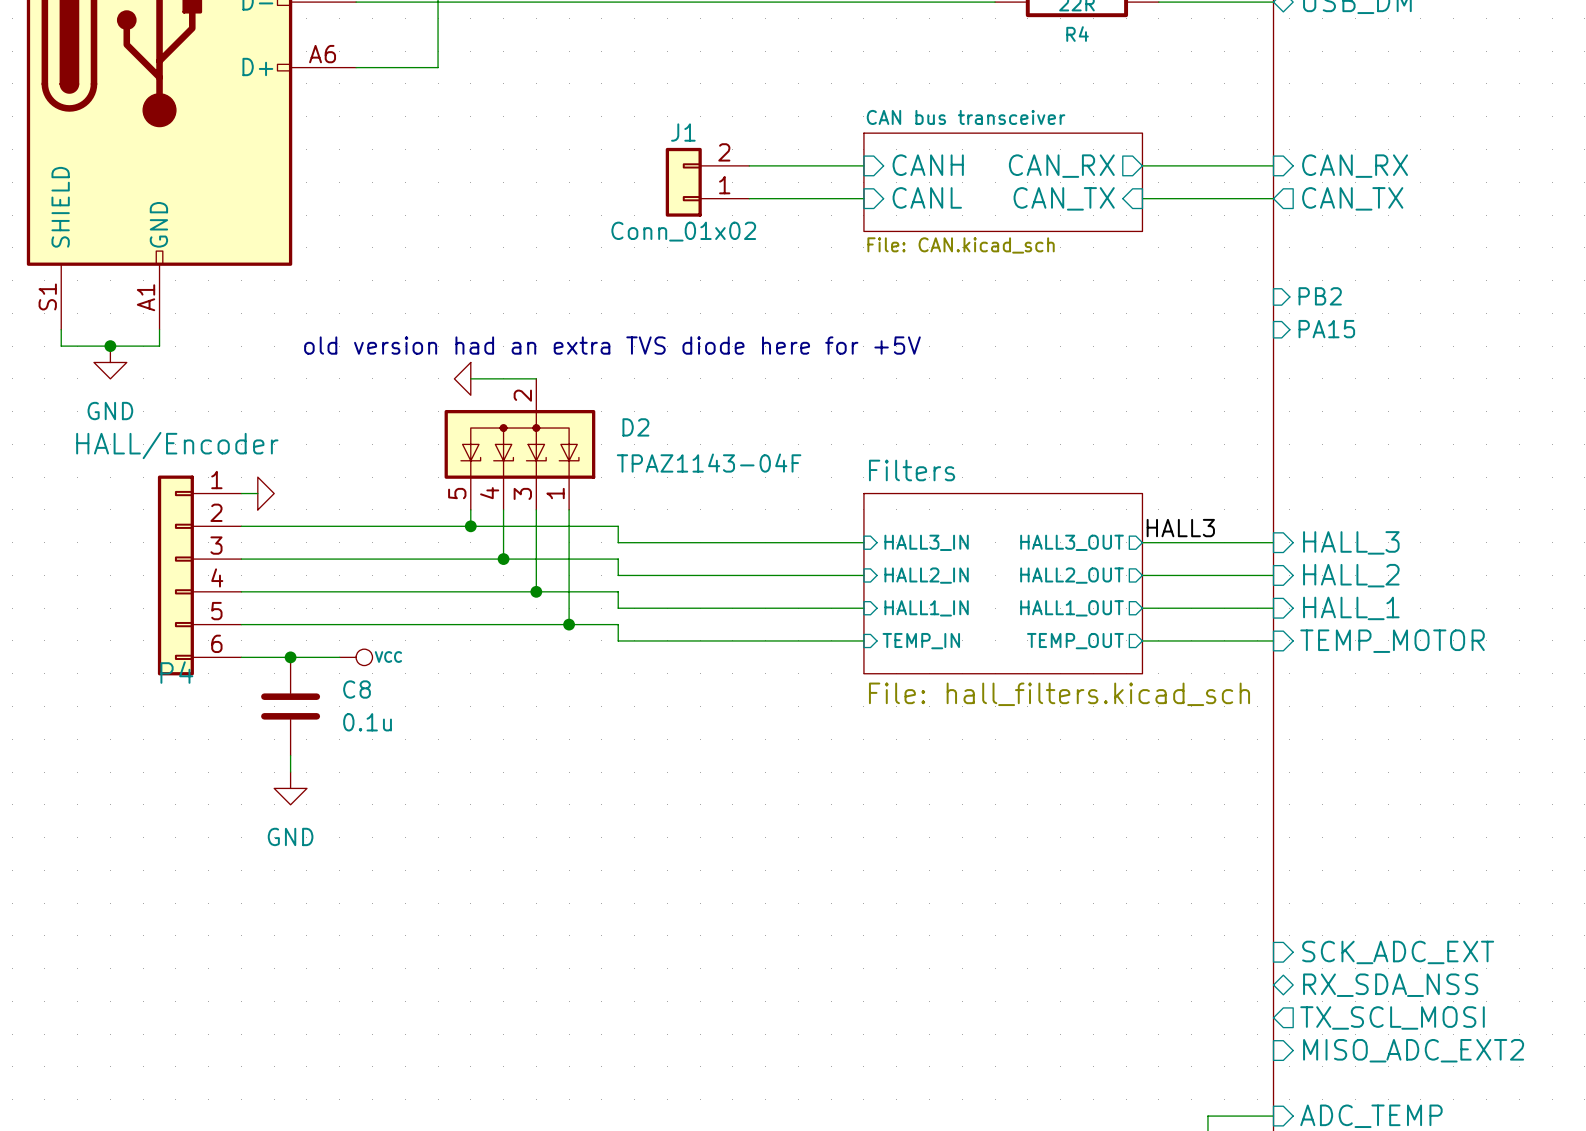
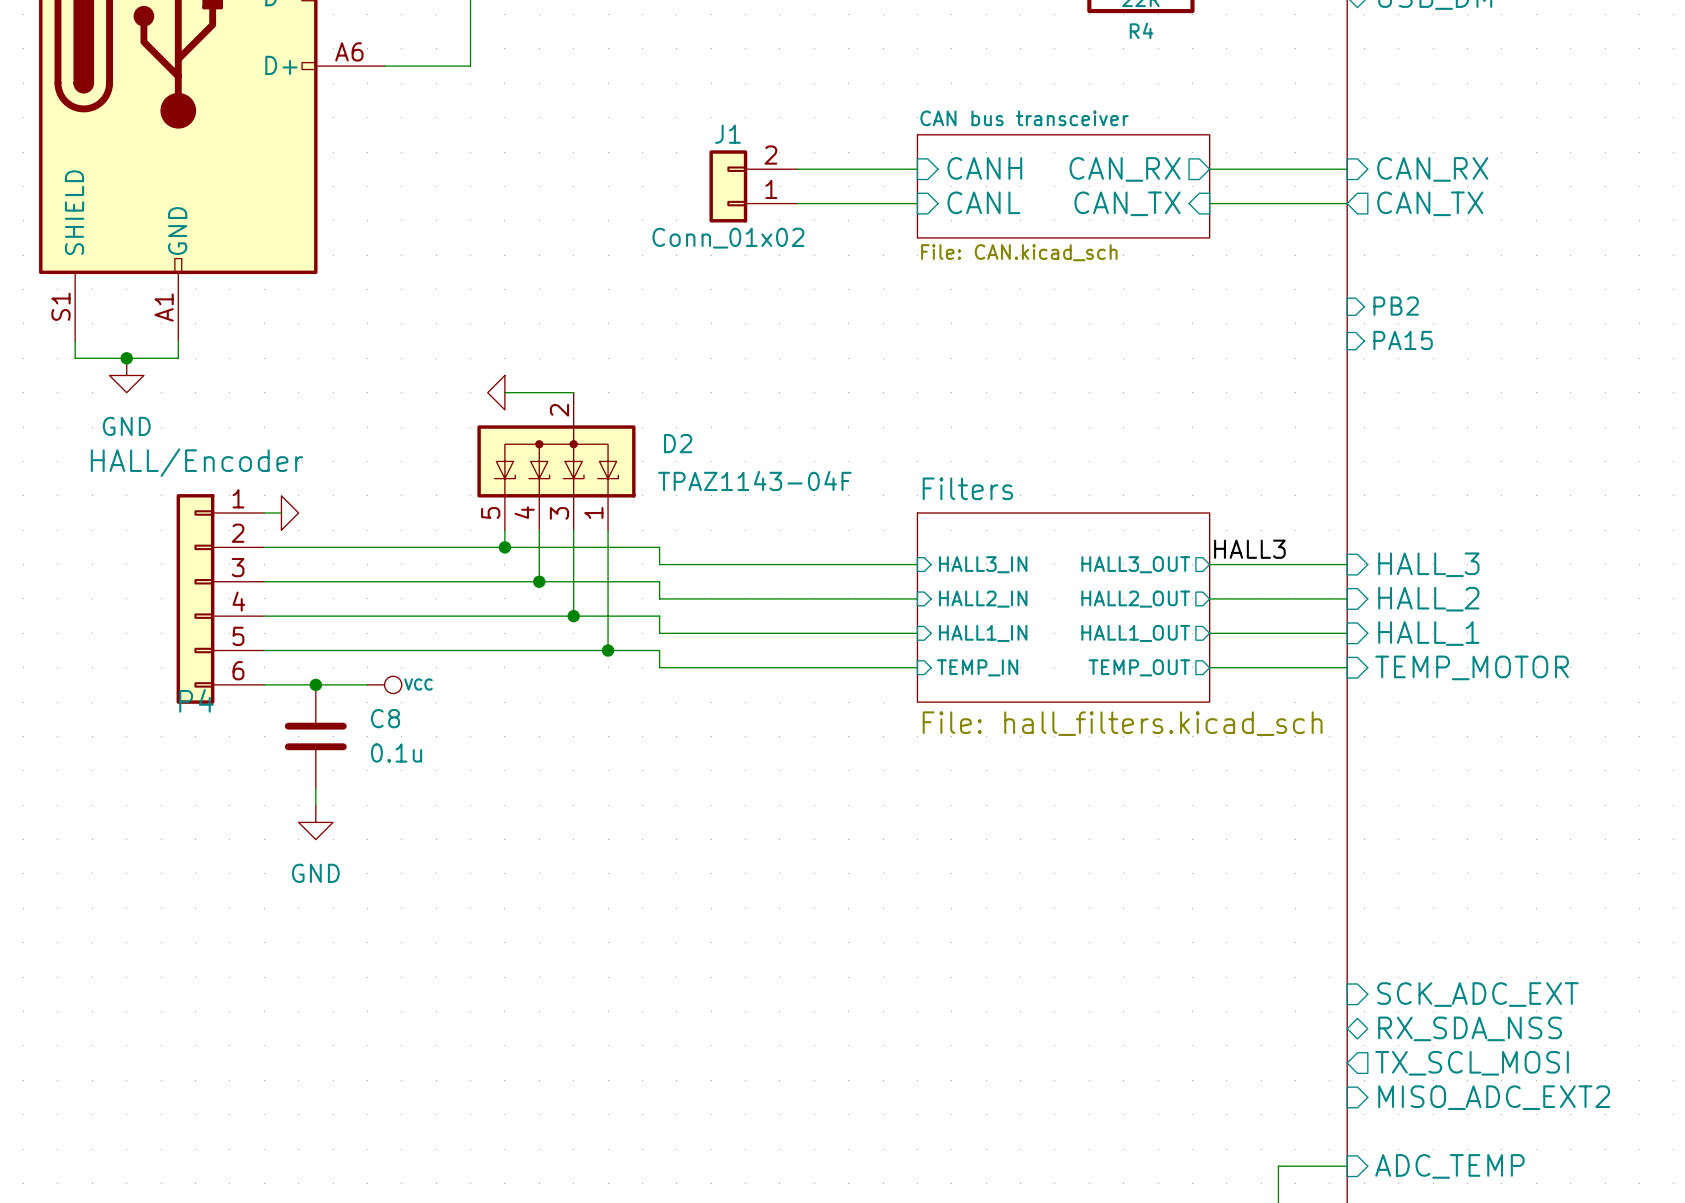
text: old version had an extra TVS diode here for +5V (612, 345) -> none

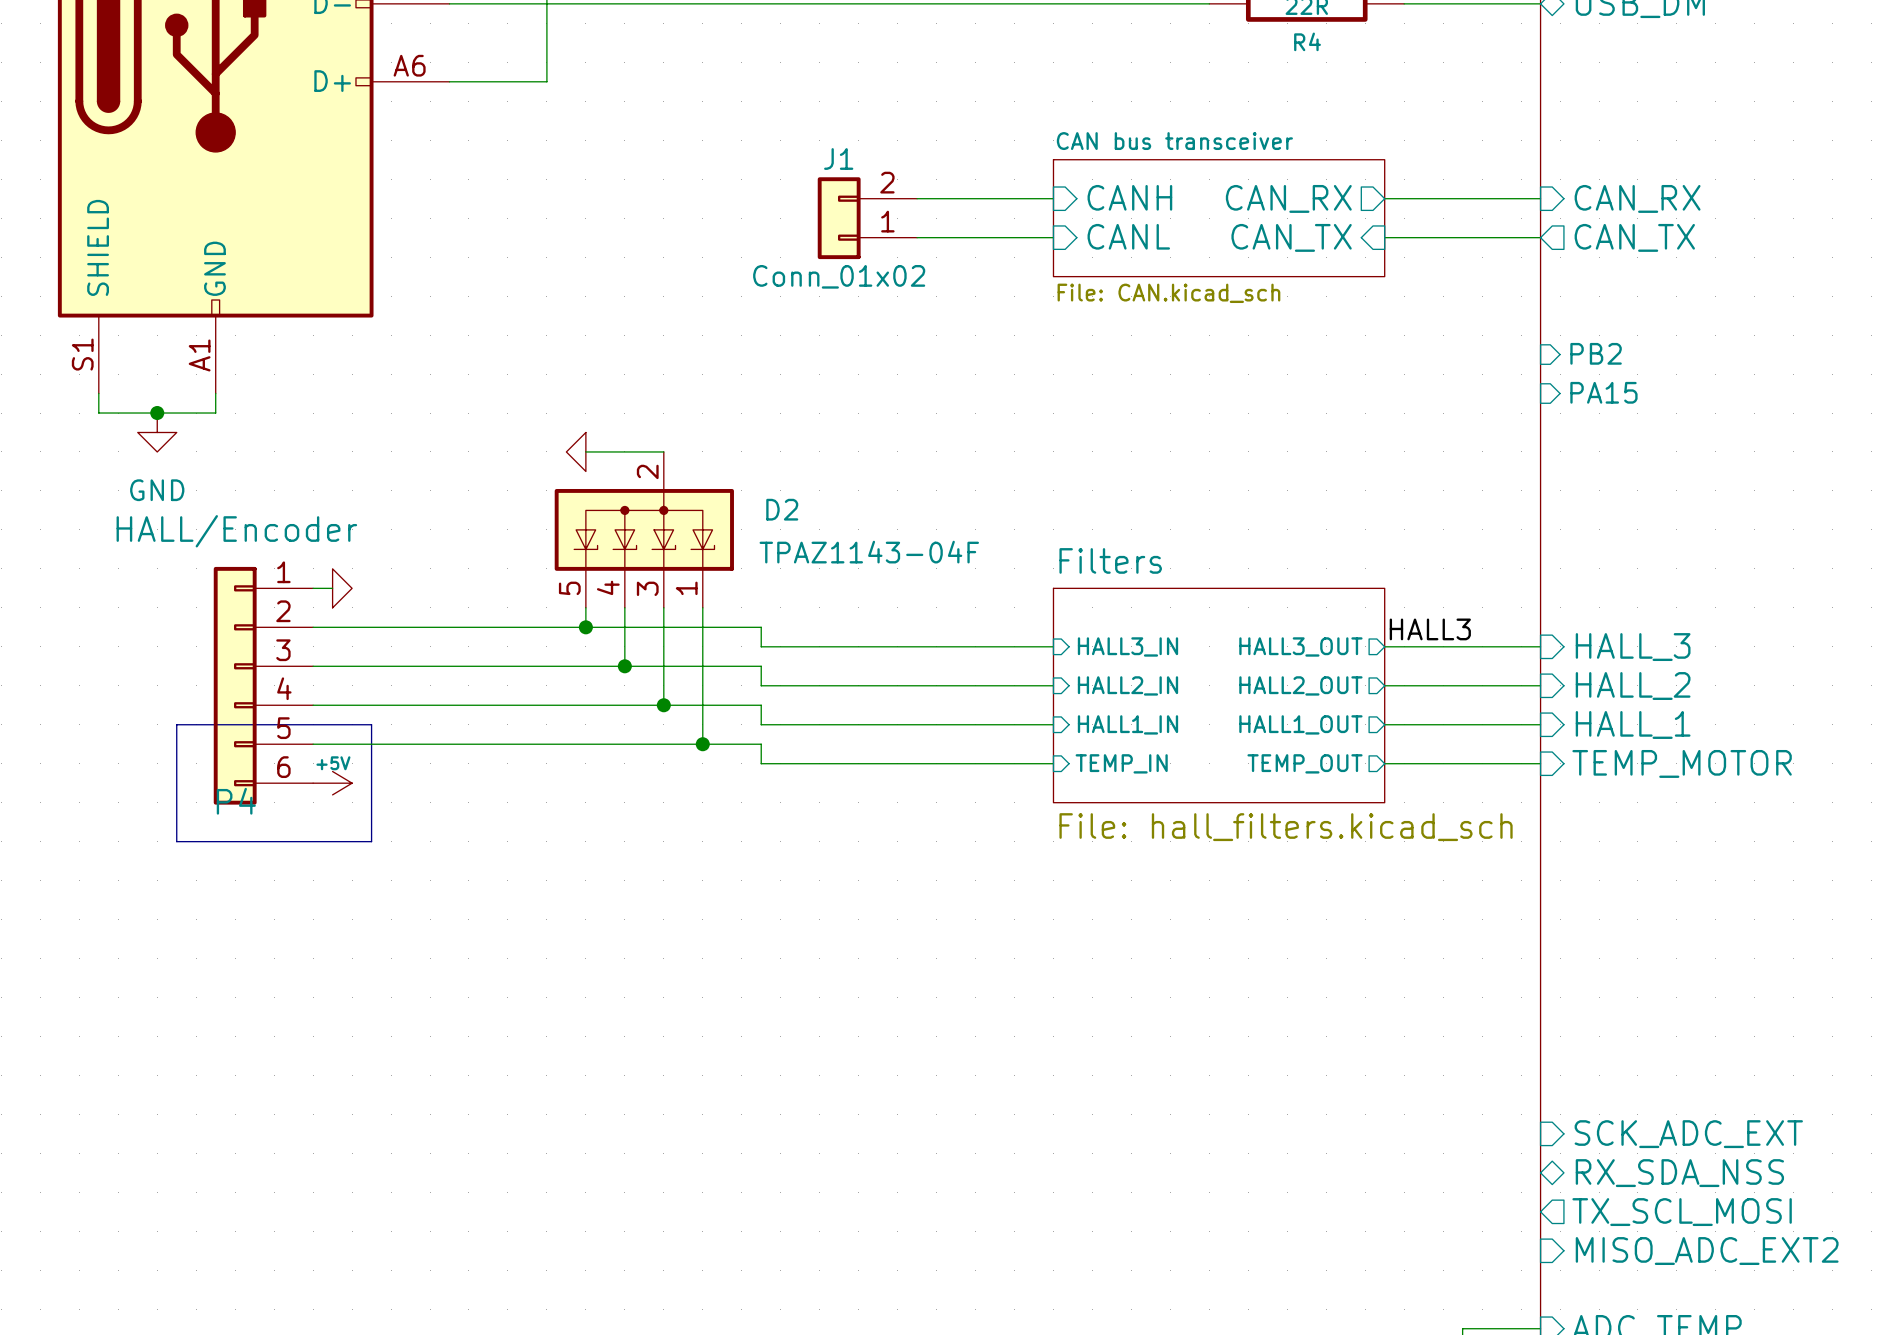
line: none -> (176, 724) (371, 724) (371, 841) (176, 841) (176, 724)
wire: (264, 684) (367, 684) -> none
power symbol: none -> +5V (332, 783)
junction: (315, 684) -> none
power symbol: VCC (384, 684) -> none
C8: 0.1u (315, 736) -> none
wire: (315, 788) (315, 805) -> none
power symbol: GND (315, 822) -> none

